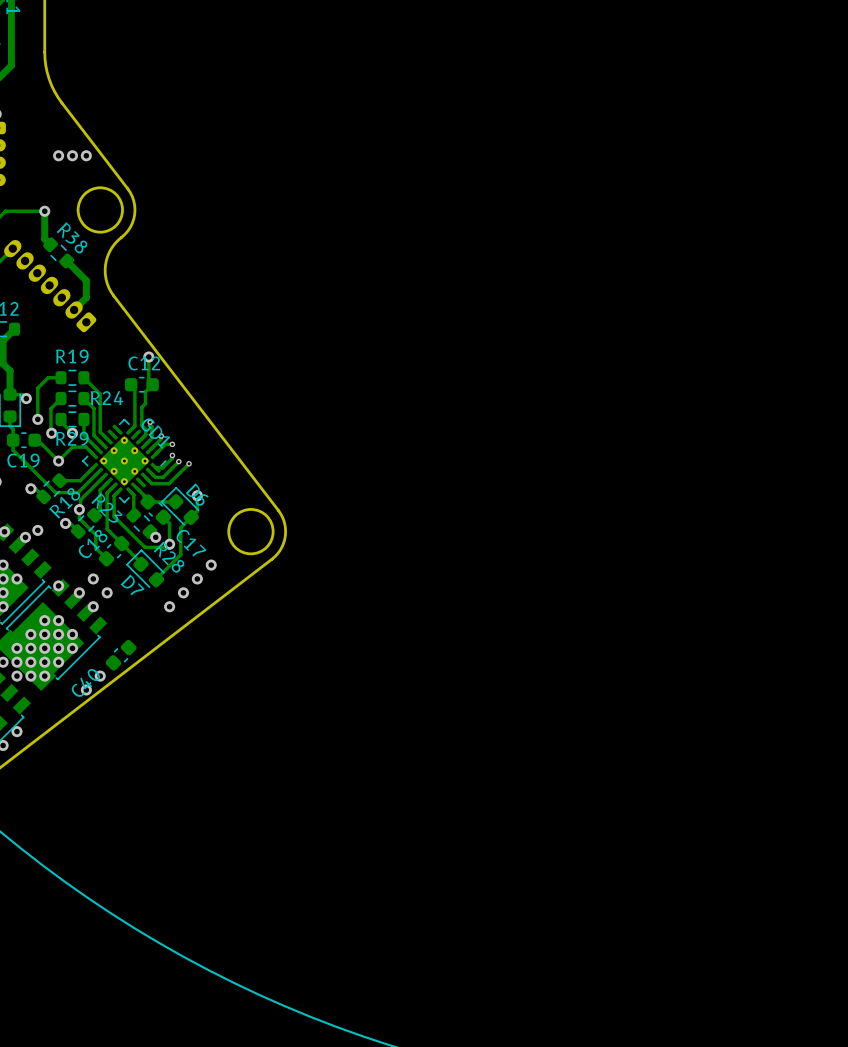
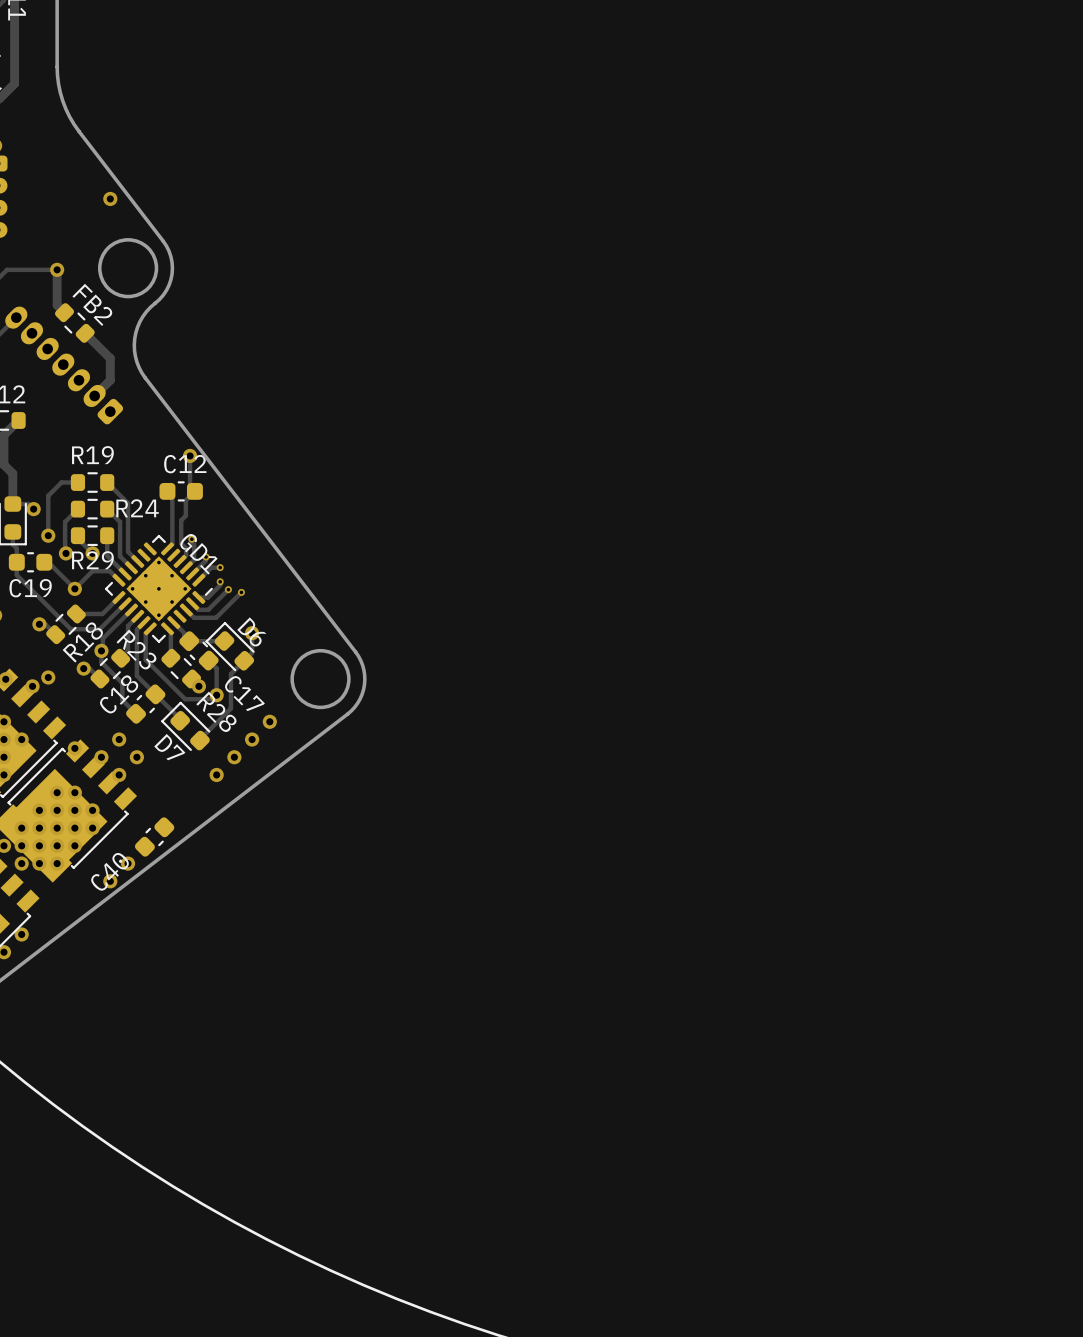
via: (58, 155) -> none
via: (72, 155) -> none
R38 name: R38 (72, 237) -> FB2 (92, 304)

